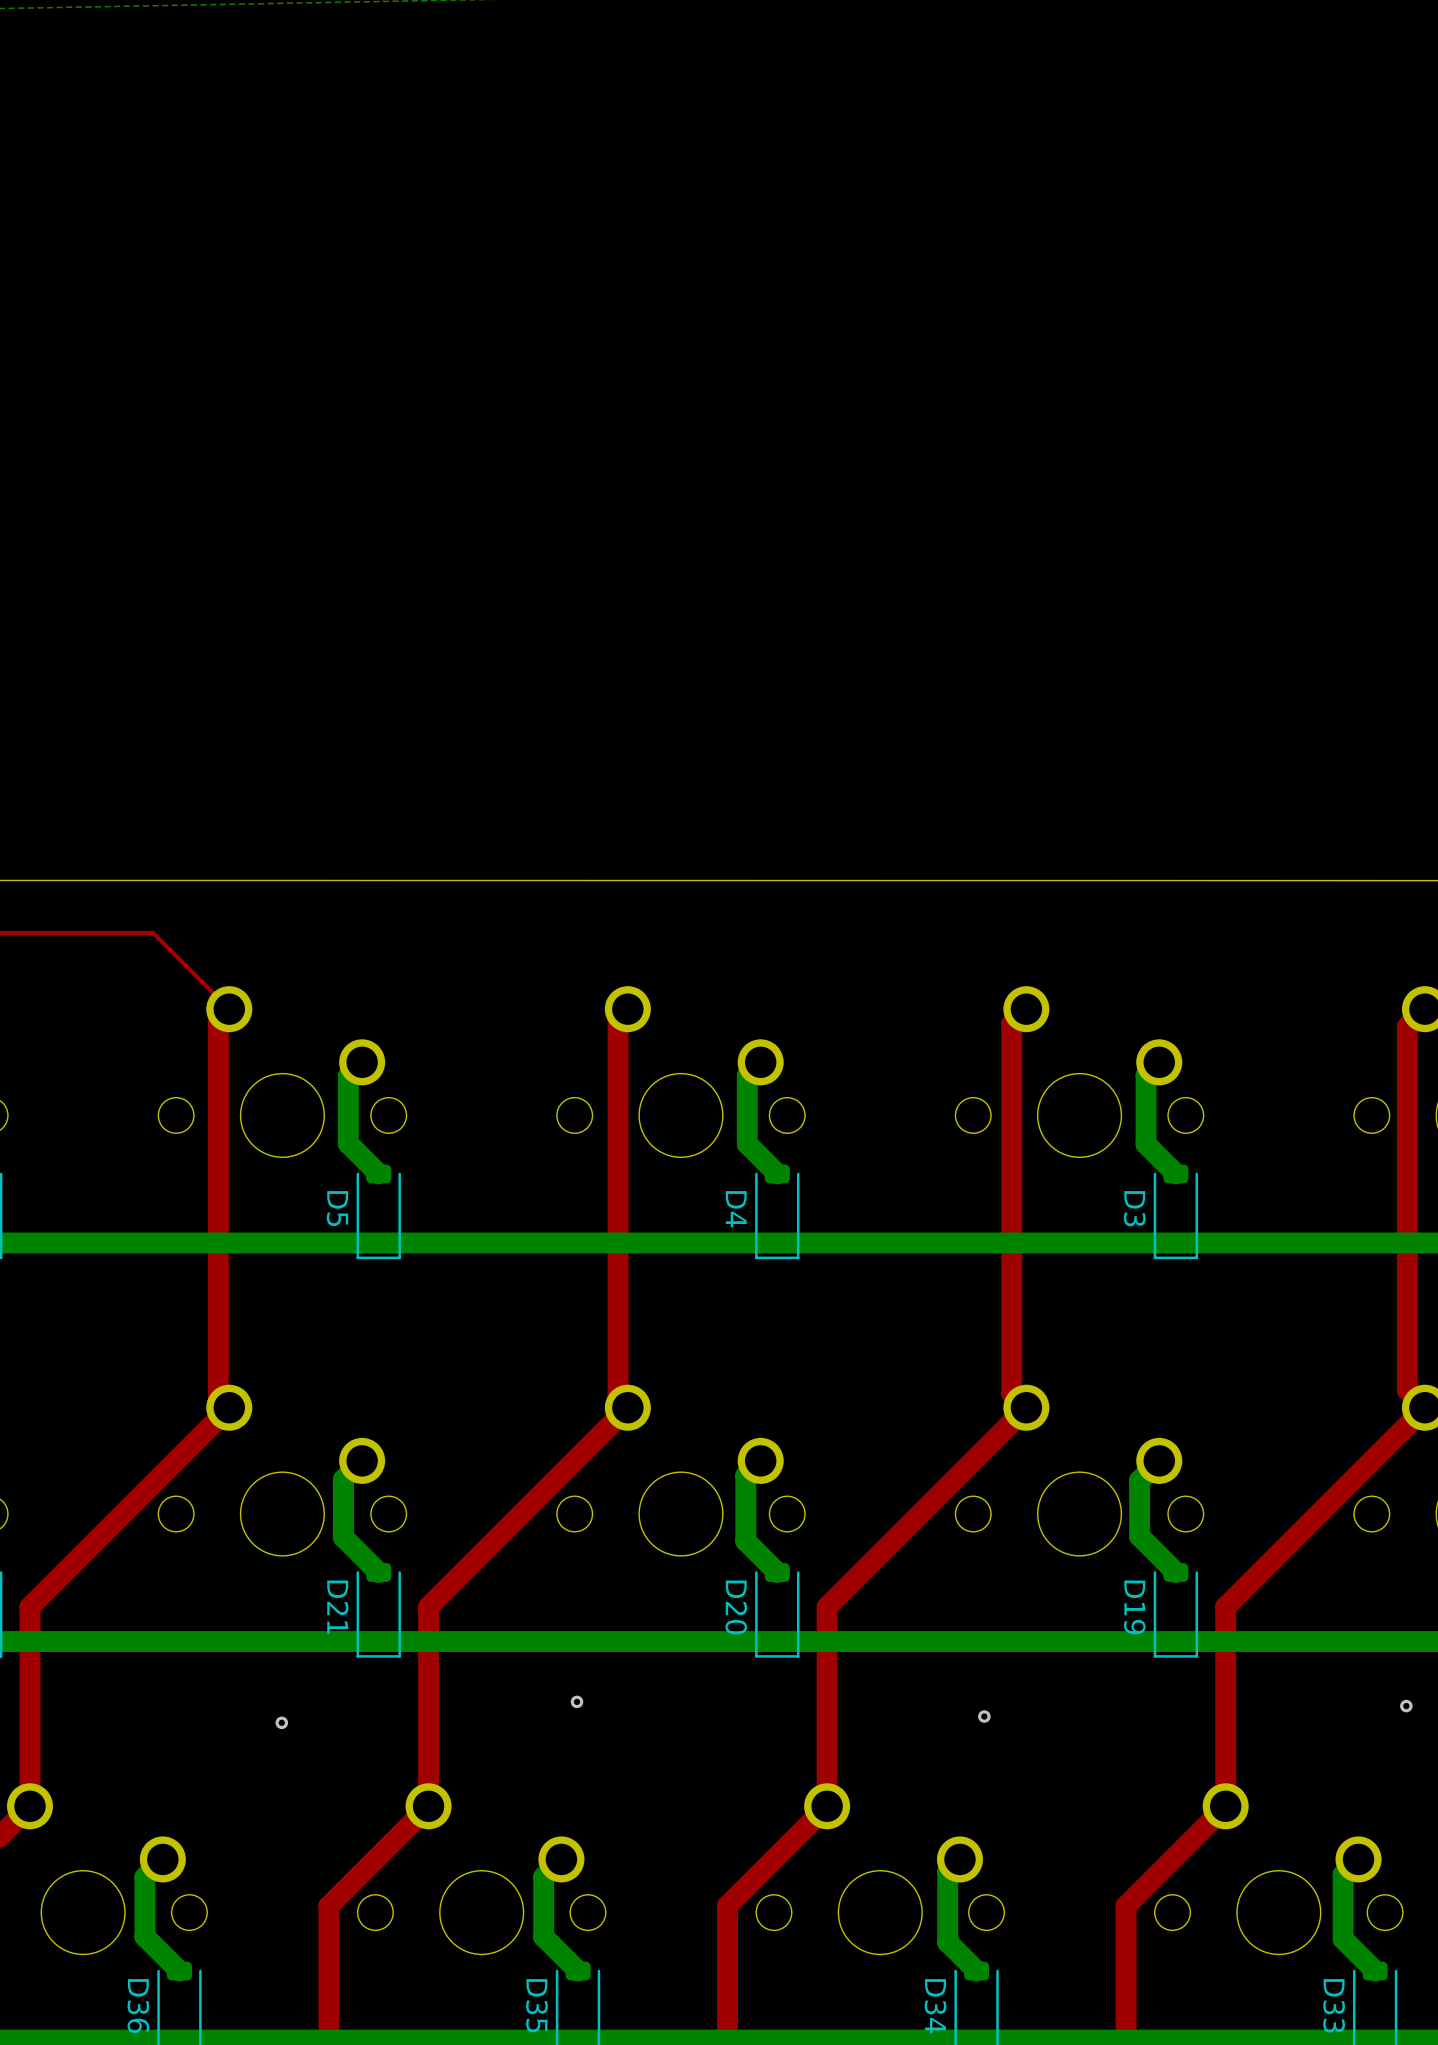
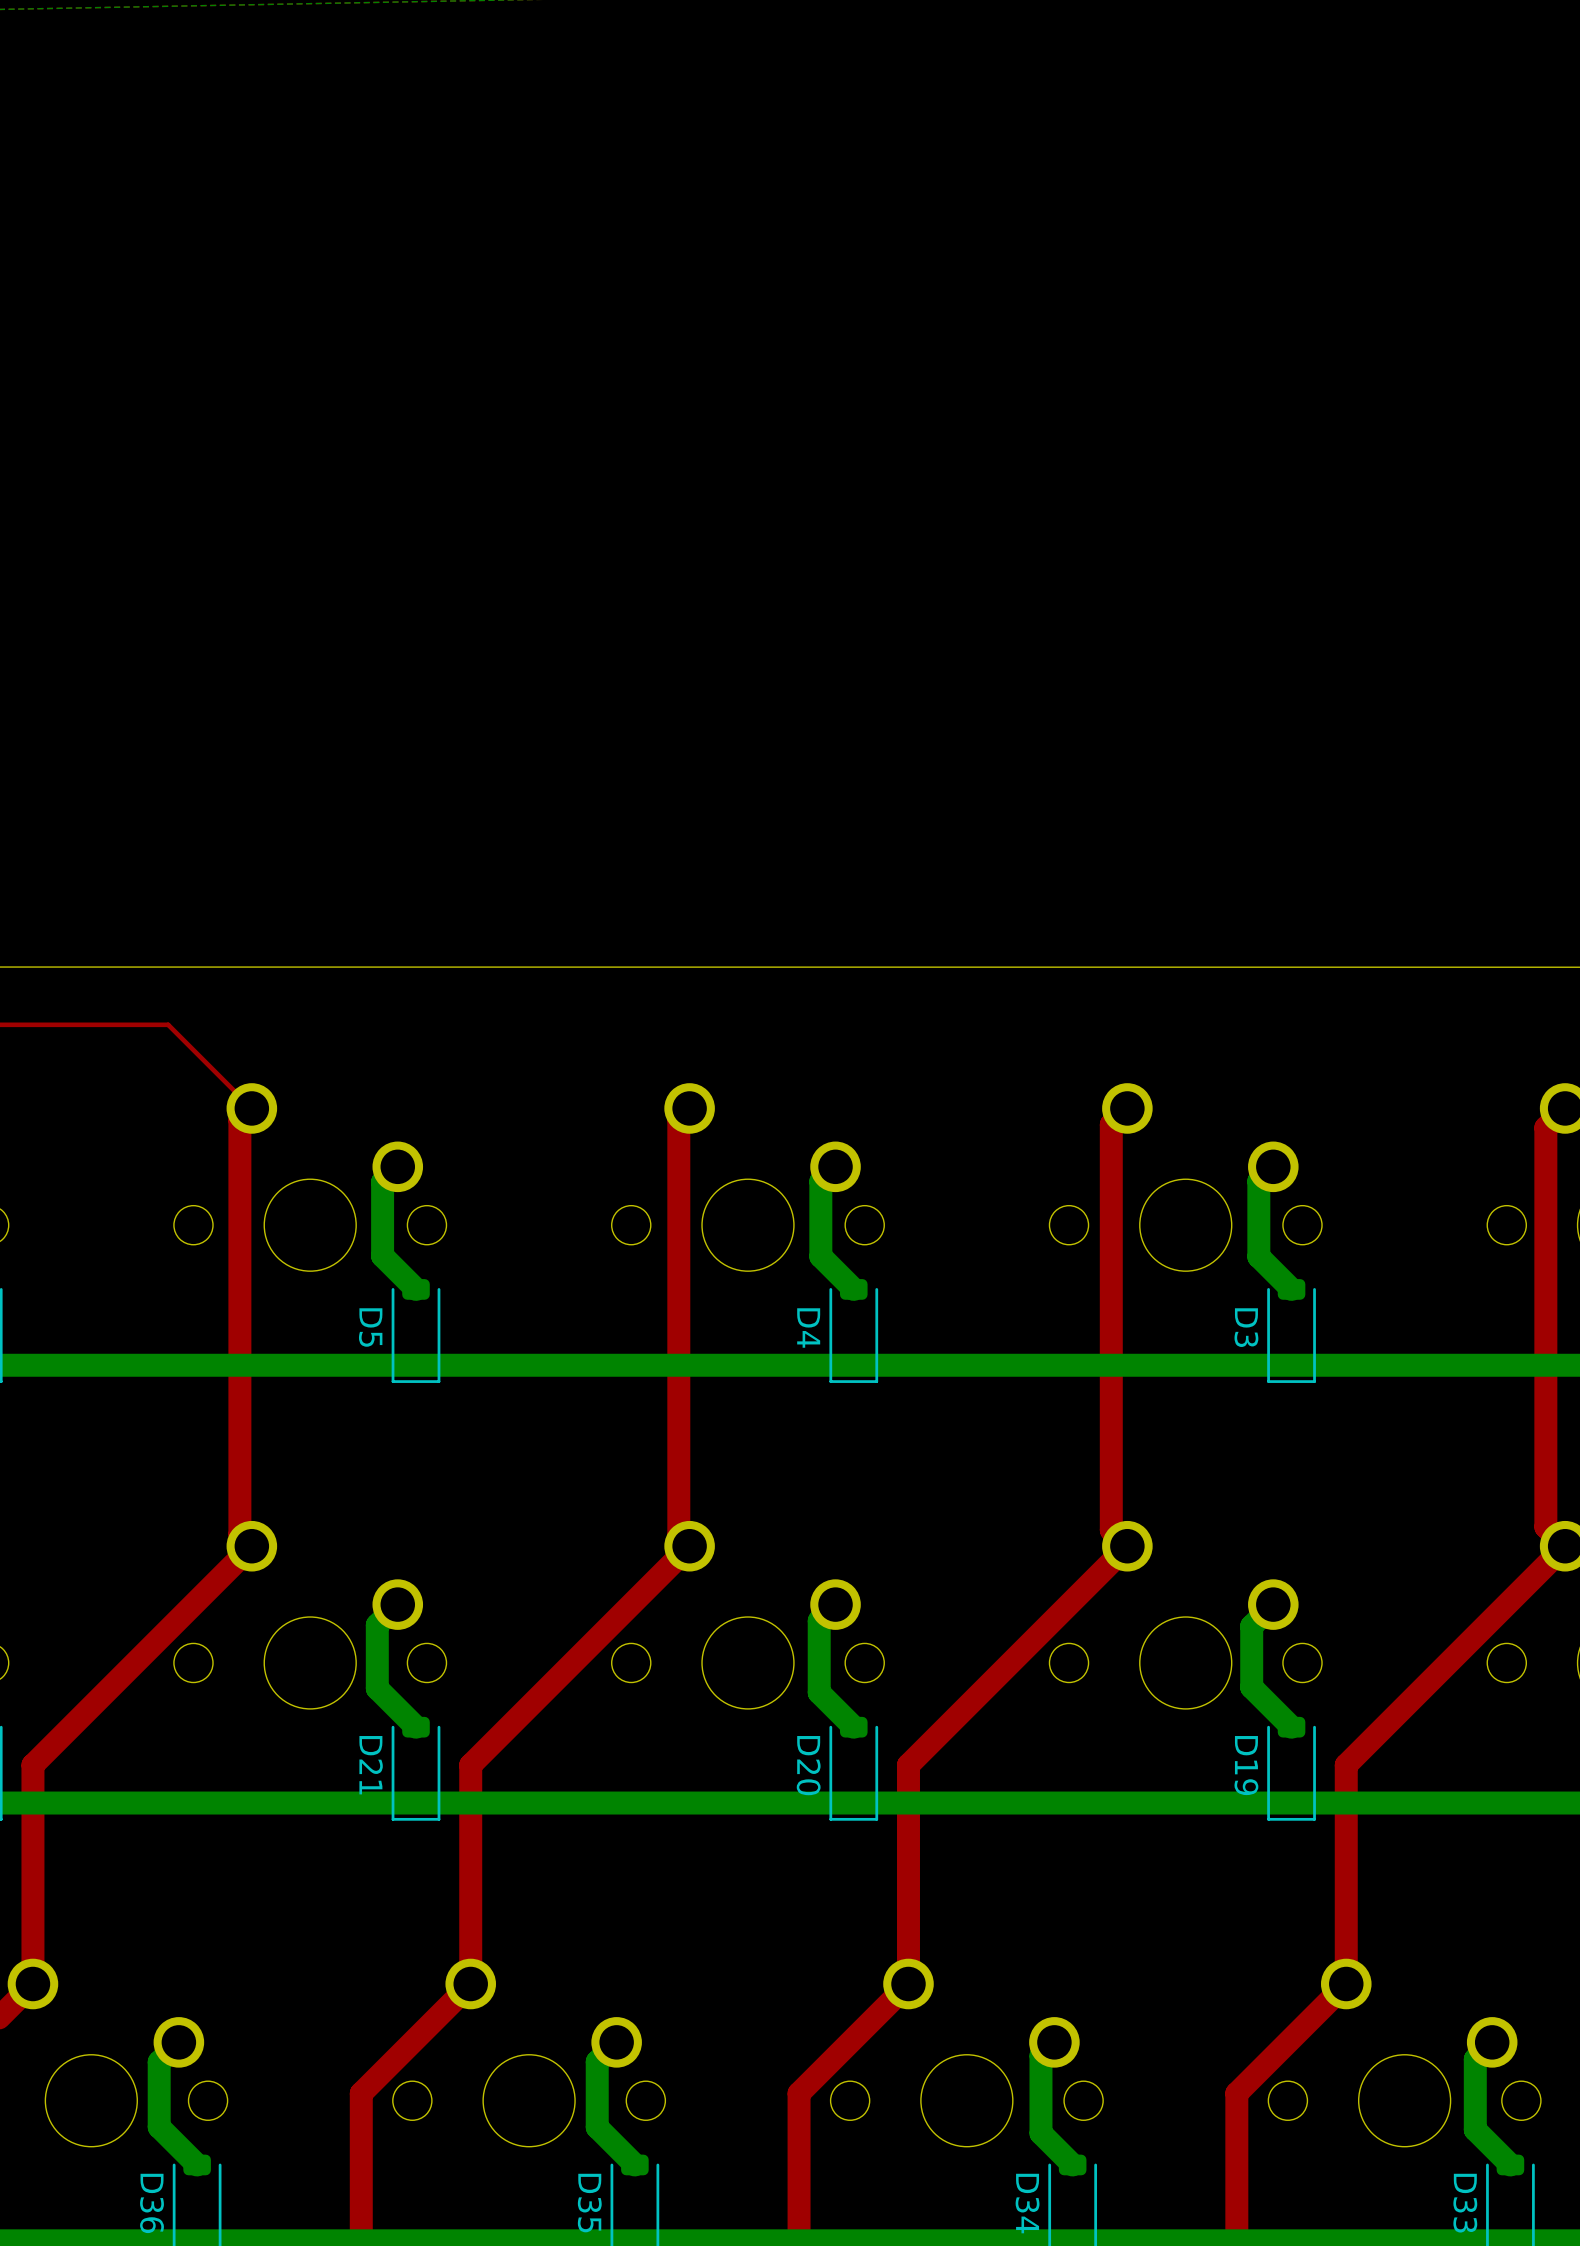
via: (577, 1701) -> none
via: (1406, 1706) -> none
via: (984, 1716) -> none
via: (281, 1722) -> none

